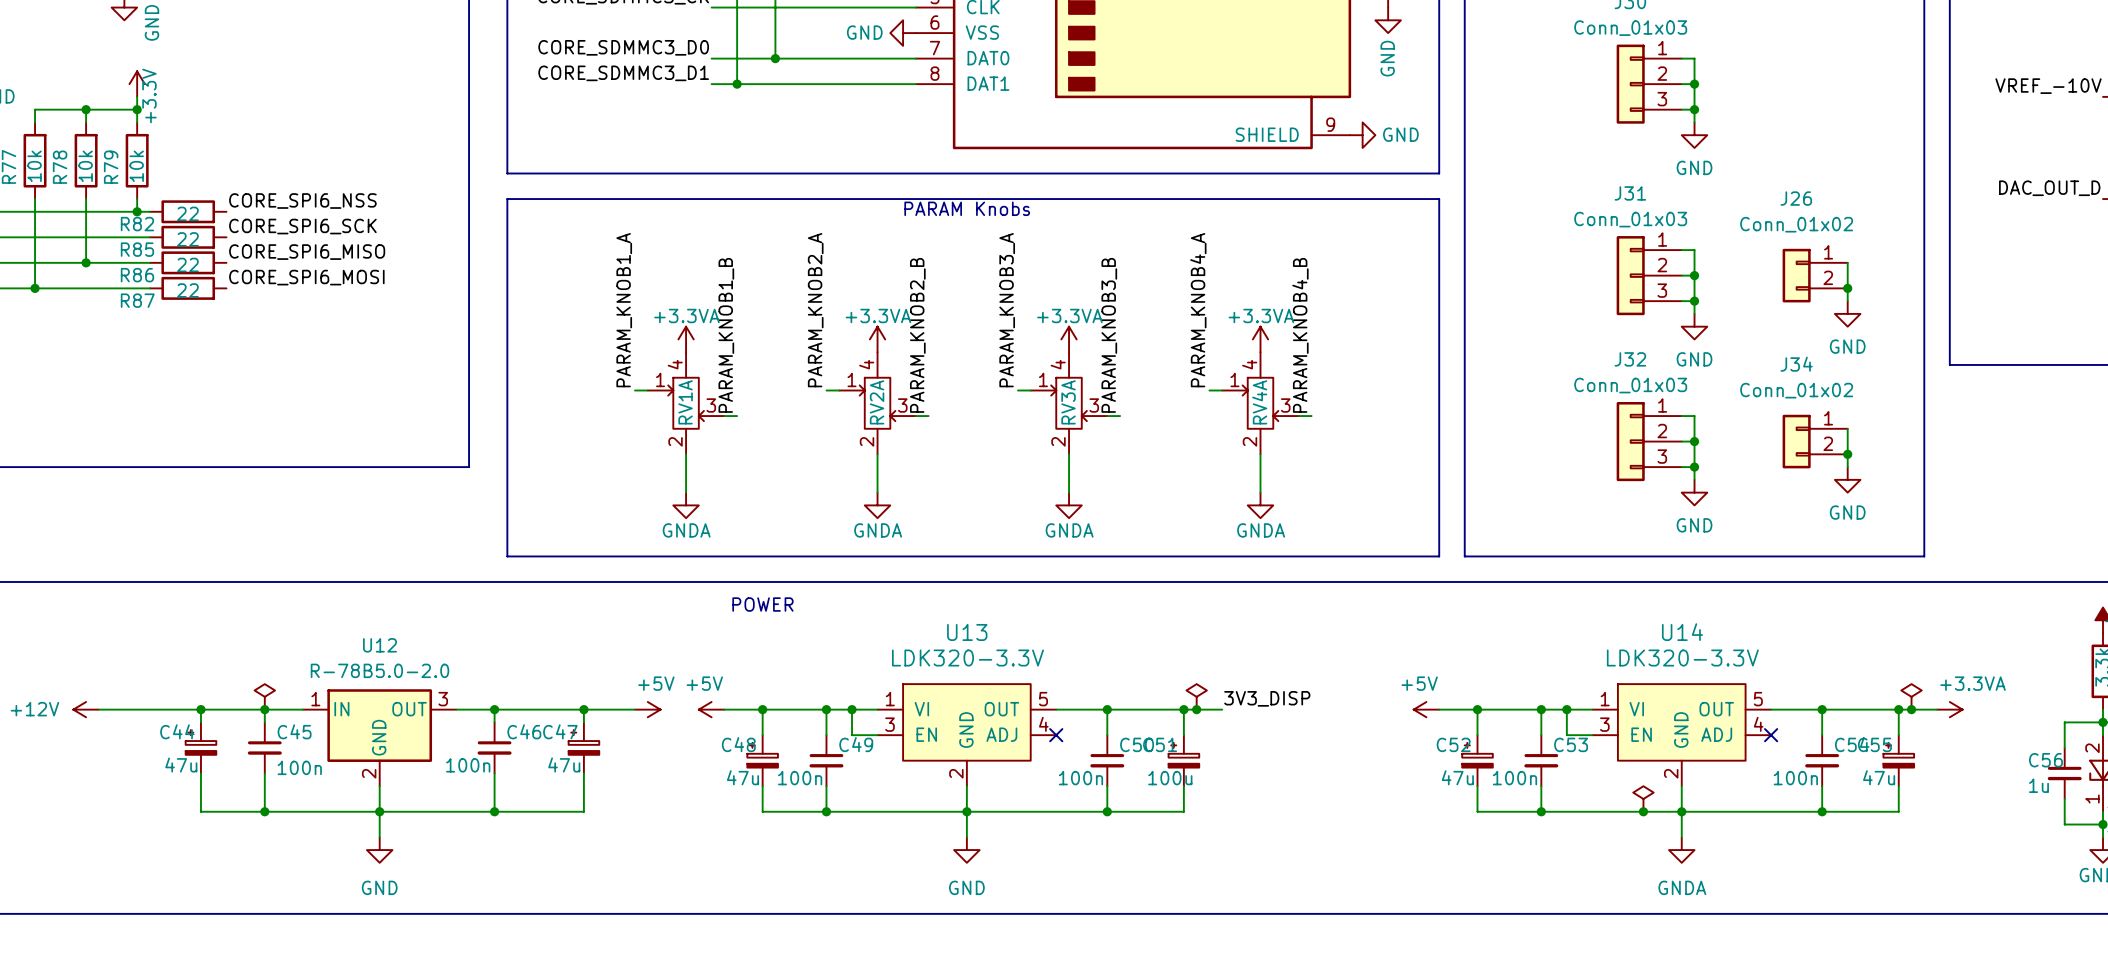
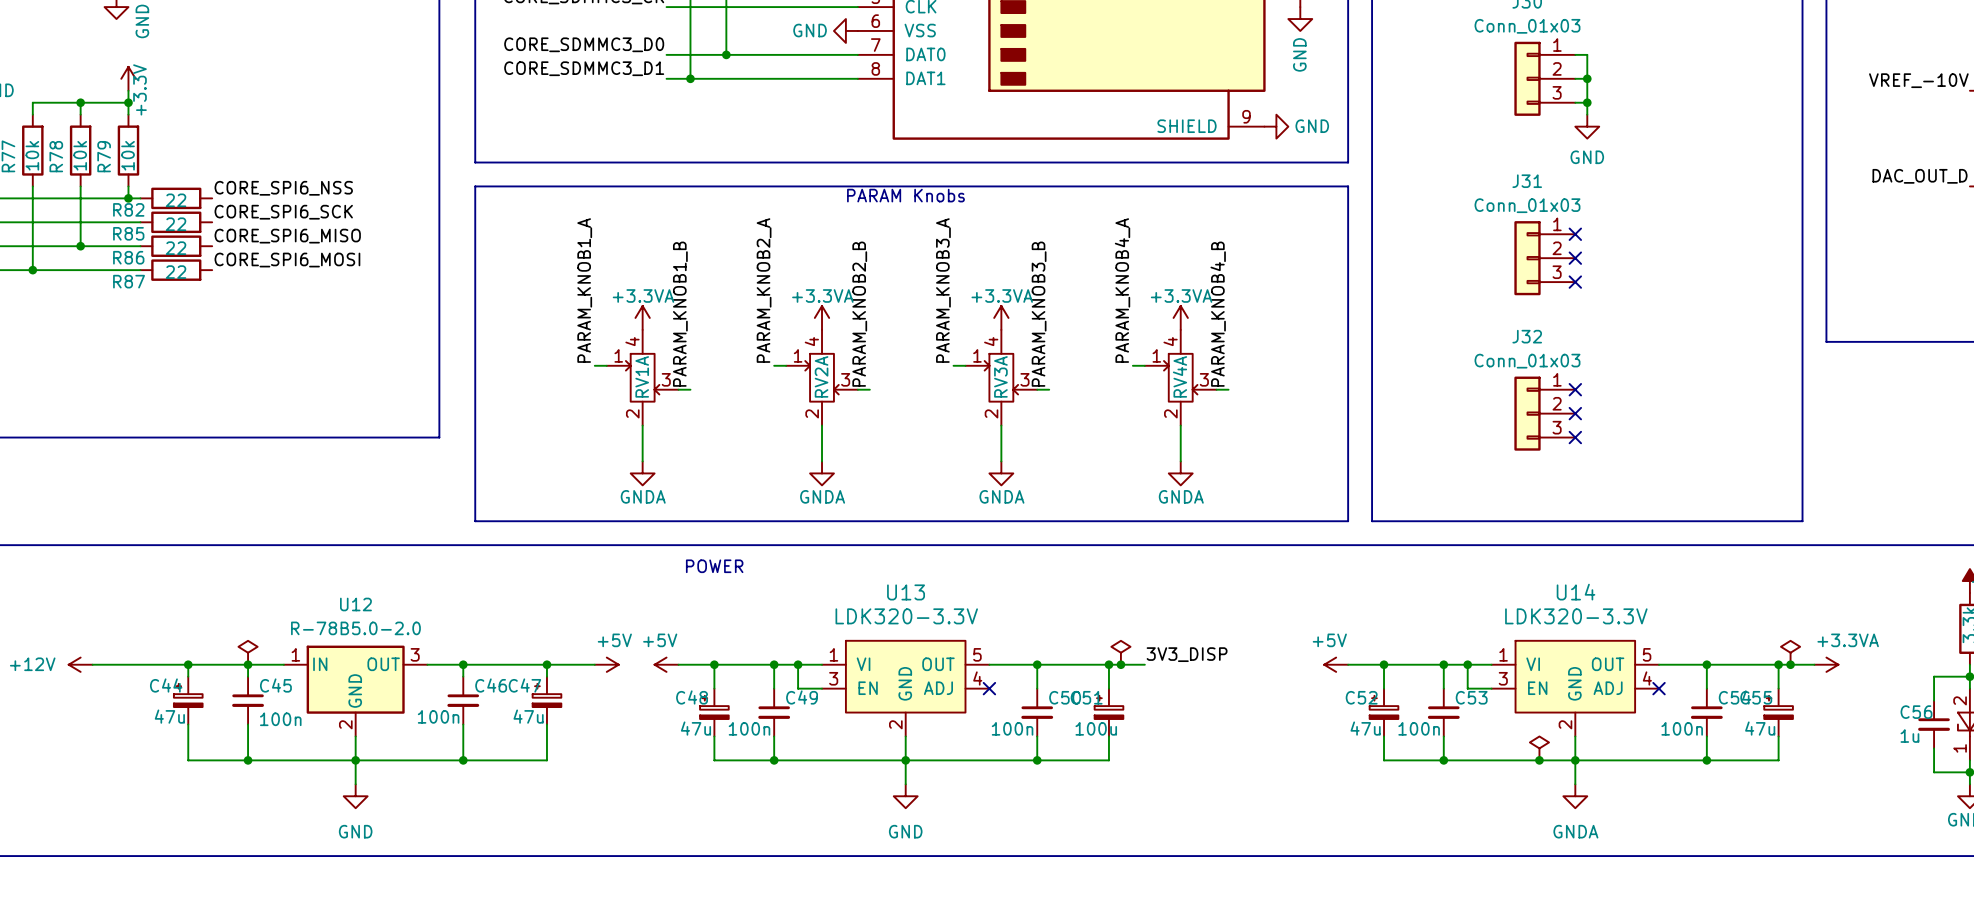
wire: (1681, 250) (1694, 250) (1694, 313) -> none
no-connect mark: none -> (1575, 234)
wire: (1847, 262) (1847, 301) -> none
wire: (1681, 275) (1694, 275) -> none
no-connect mark: none -> (1575, 258)
junction: (1694, 275) -> none
J26: Conn_01x02 (1815, 275) -> none
junction: (1847, 288) -> none
wire: (1681, 301) (1694, 301) -> none
no-connect mark: none -> (1575, 282)
junction: (1694, 301) -> none
power symbol: GND (1847, 313) -> none
power symbol: GND (1694, 326) -> none
wire: (1681, 416) (1694, 416) (1694, 479) -> none
no-connect mark: none -> (1575, 389)
wire: (1847, 428) (1847, 467) -> none
wire: (1681, 441) (1694, 441) -> none
no-connect mark: none -> (1575, 413)
junction: (1694, 441) -> none
J34: Conn_01x02 (1815, 441) -> none
junction: (1847, 454) -> none
wire: (1681, 467) (1694, 467) -> none
no-connect mark: none -> (1575, 437)
junction: (1694, 467) -> none
power symbol: GND (1847, 479) -> none
power symbol: GND (1694, 492) -> none

